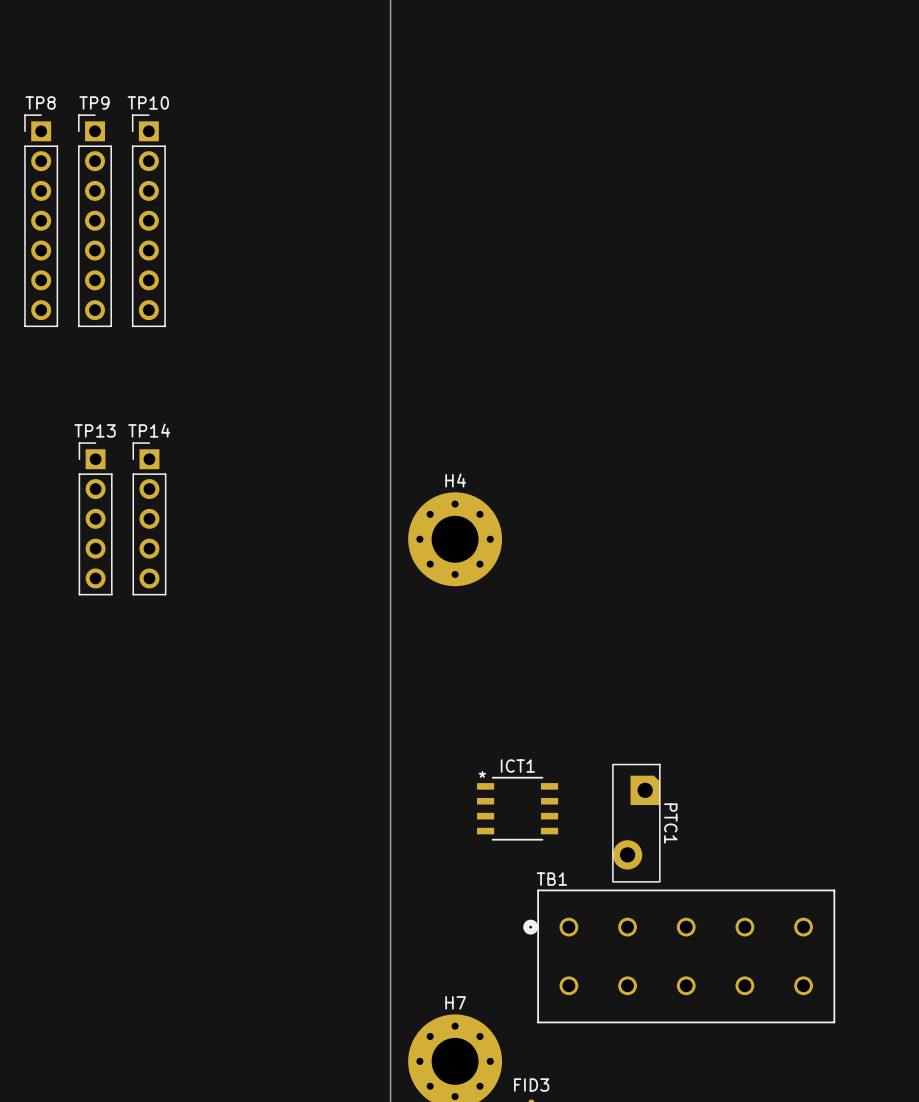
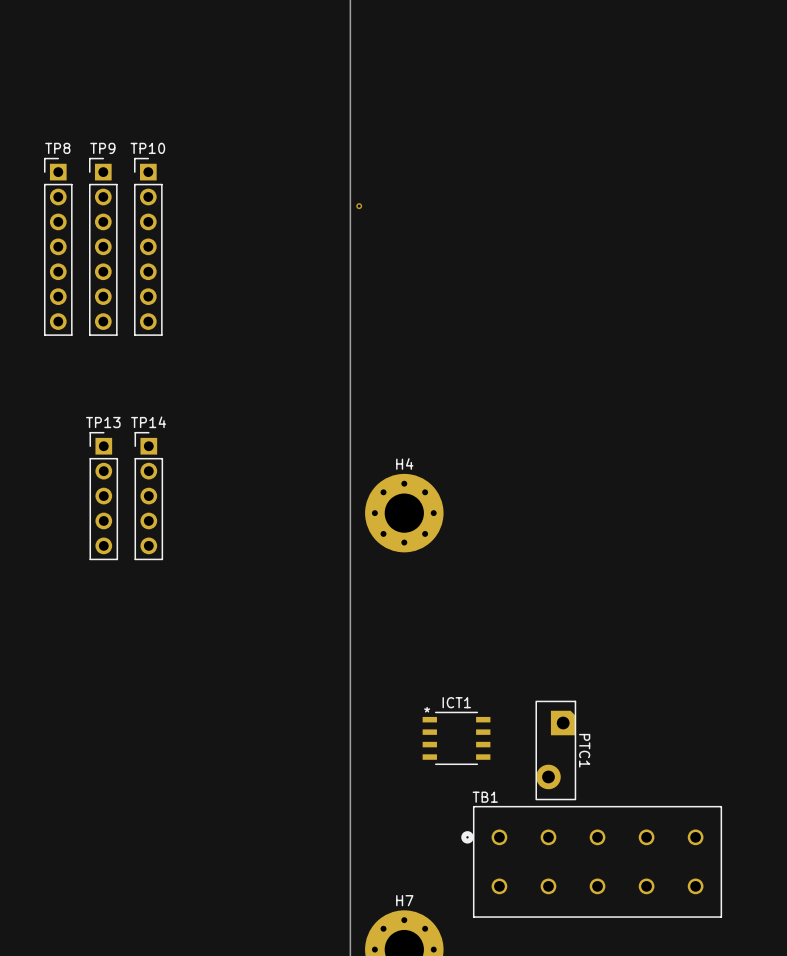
via: none -> (359, 206)

